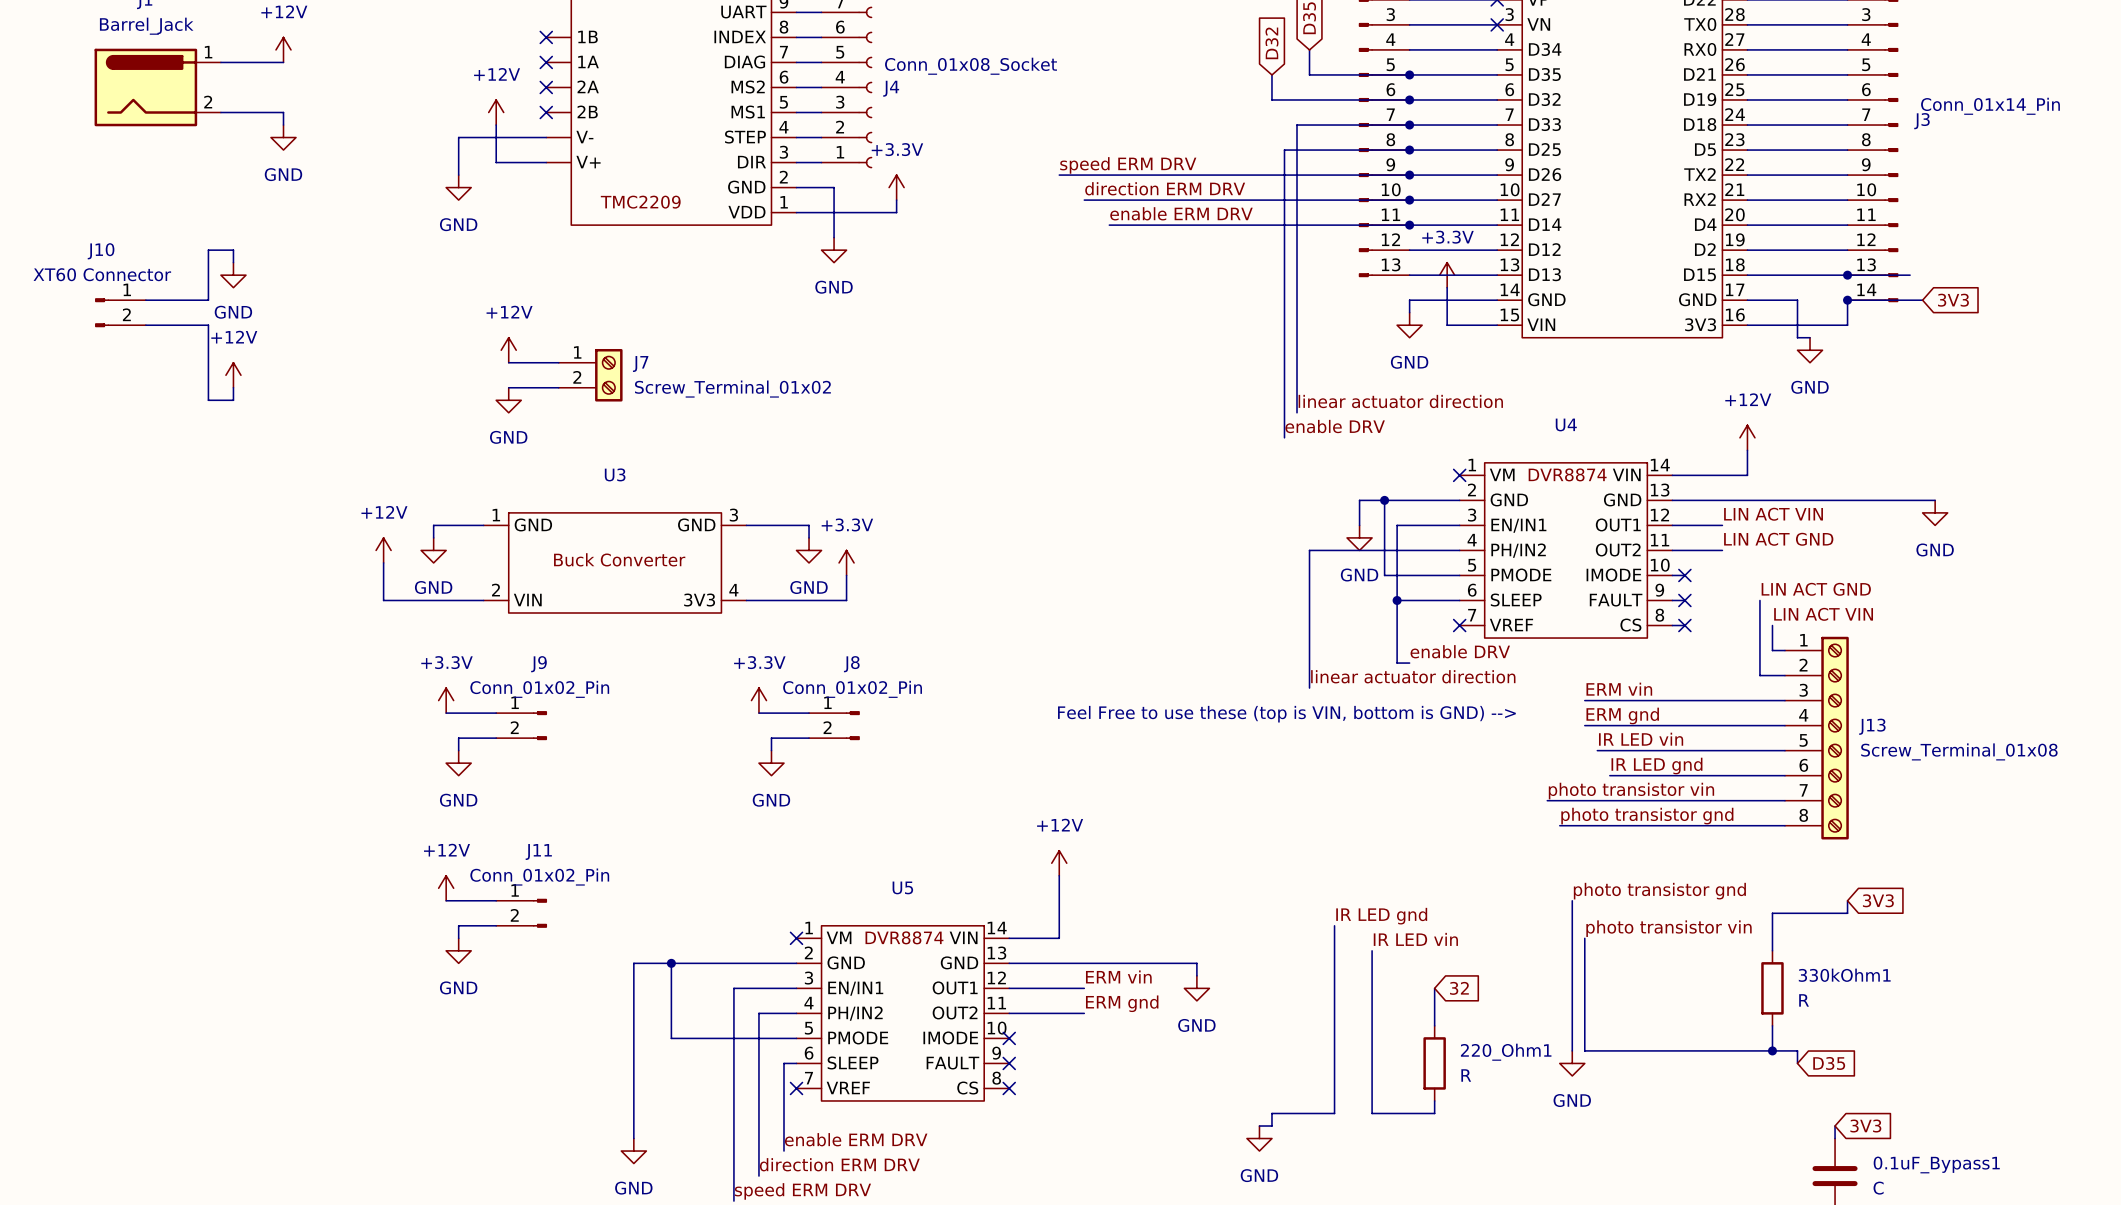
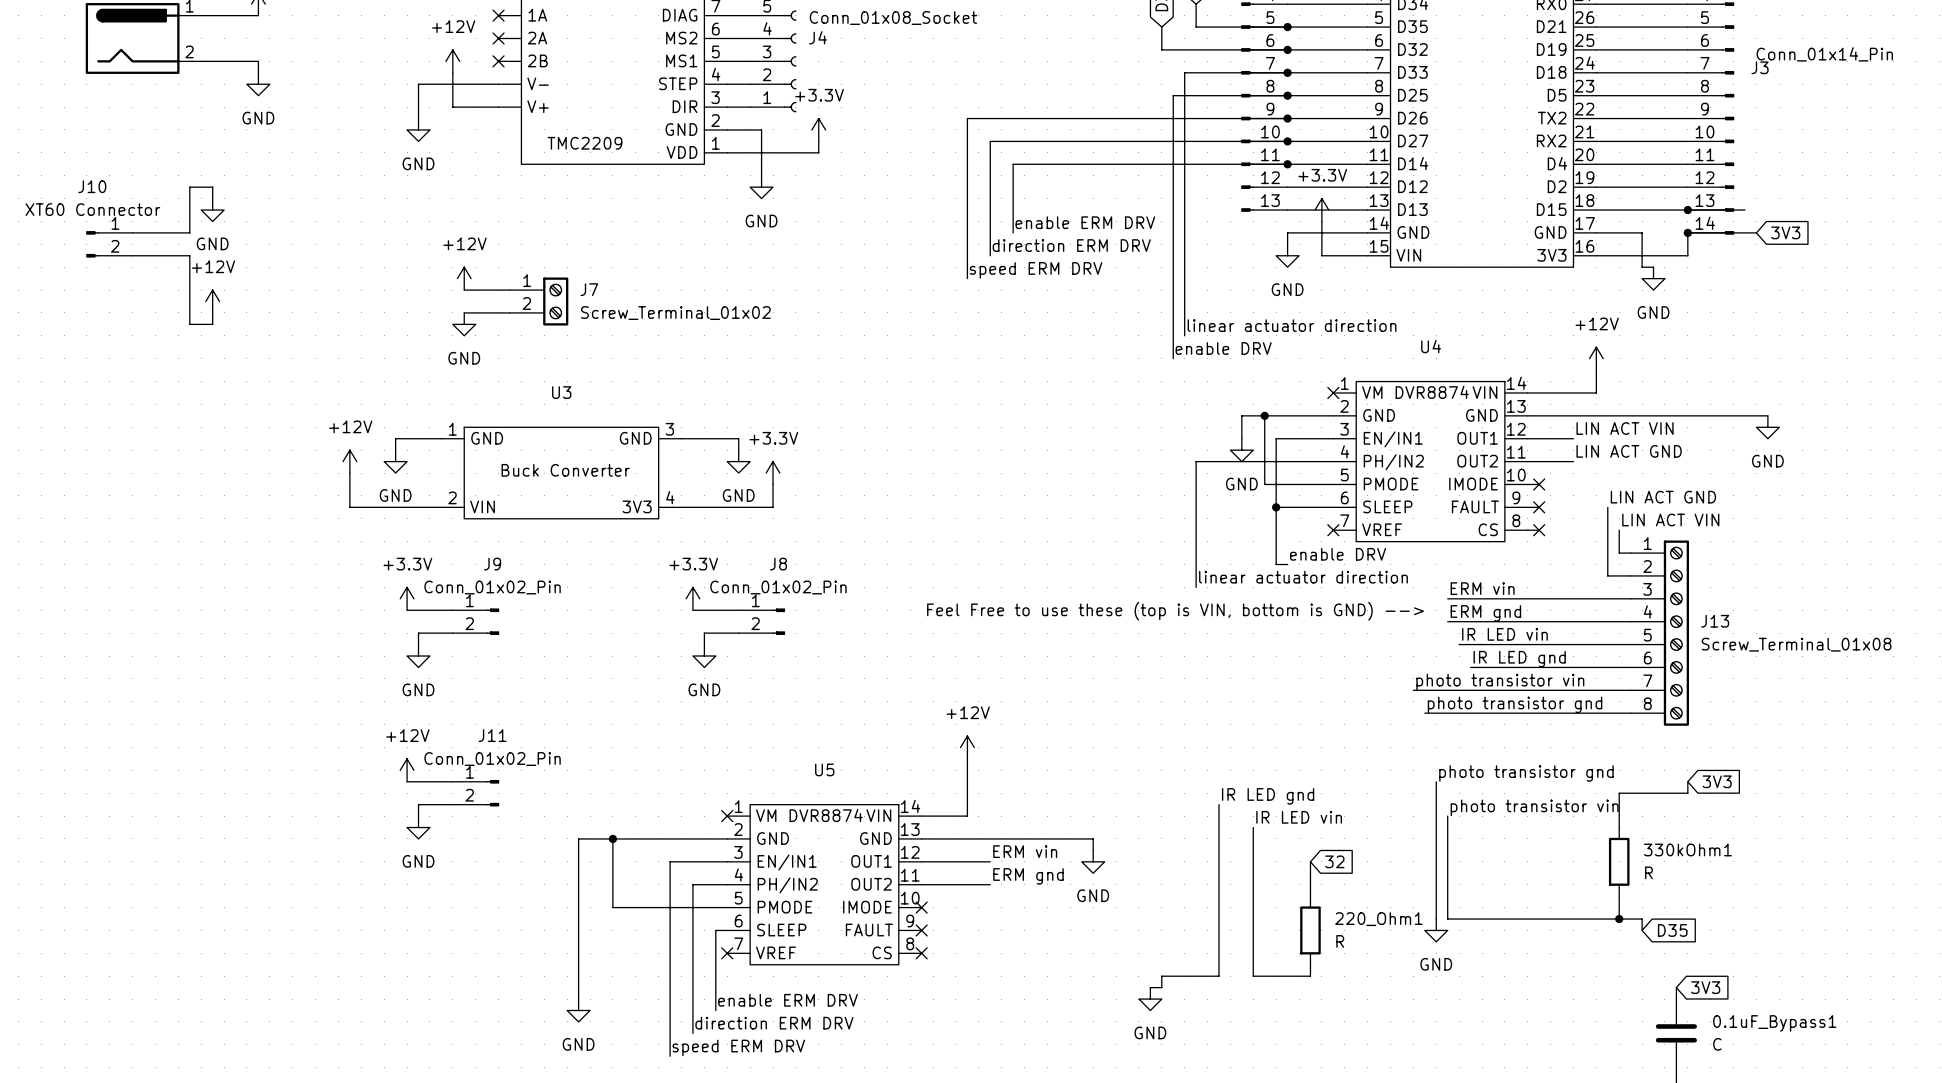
label position: speed ERM DRV (1128, 165) -> speed ERM DRV (1036, 270)
wire: none -> (967, 118) (967, 278)
label position: direction ERM DRV (1165, 188) -> direction ERM DRV (1071, 245)
wire: none -> (990, 141) (990, 255)
label position: enable ERM DRV (1181, 213) -> enable ERM DRV (1085, 222)
wire: none -> (1013, 164) (1013, 232)

